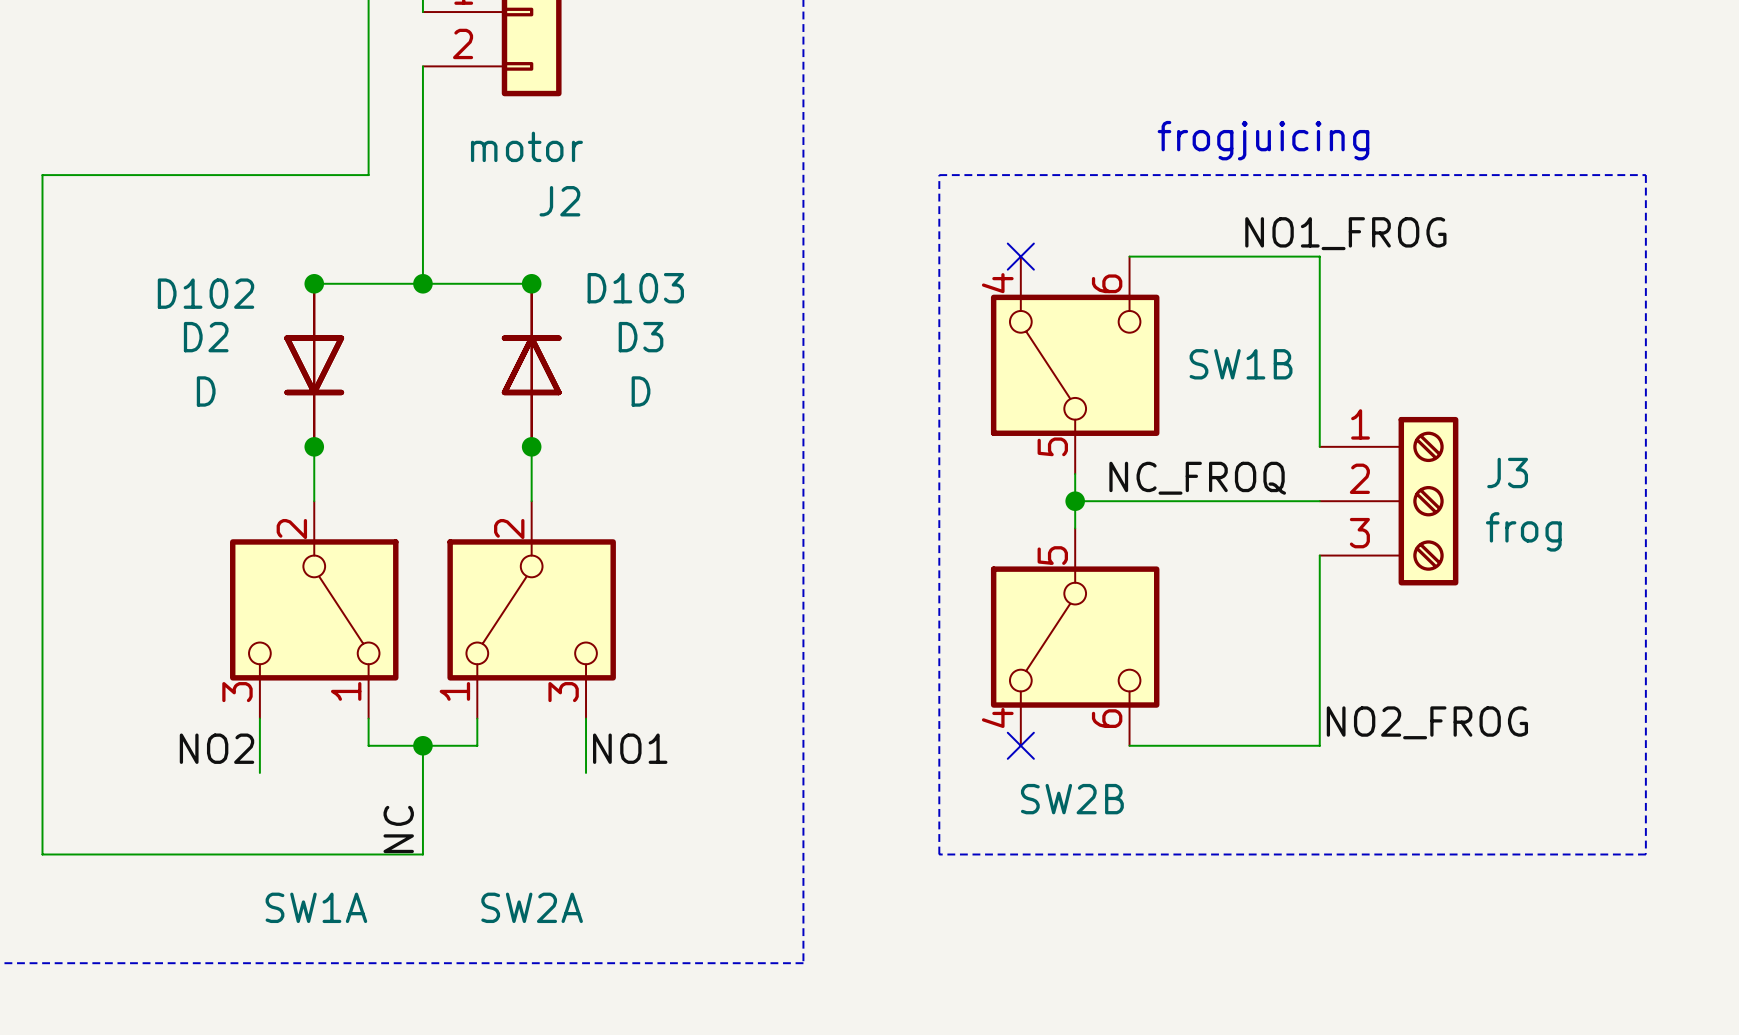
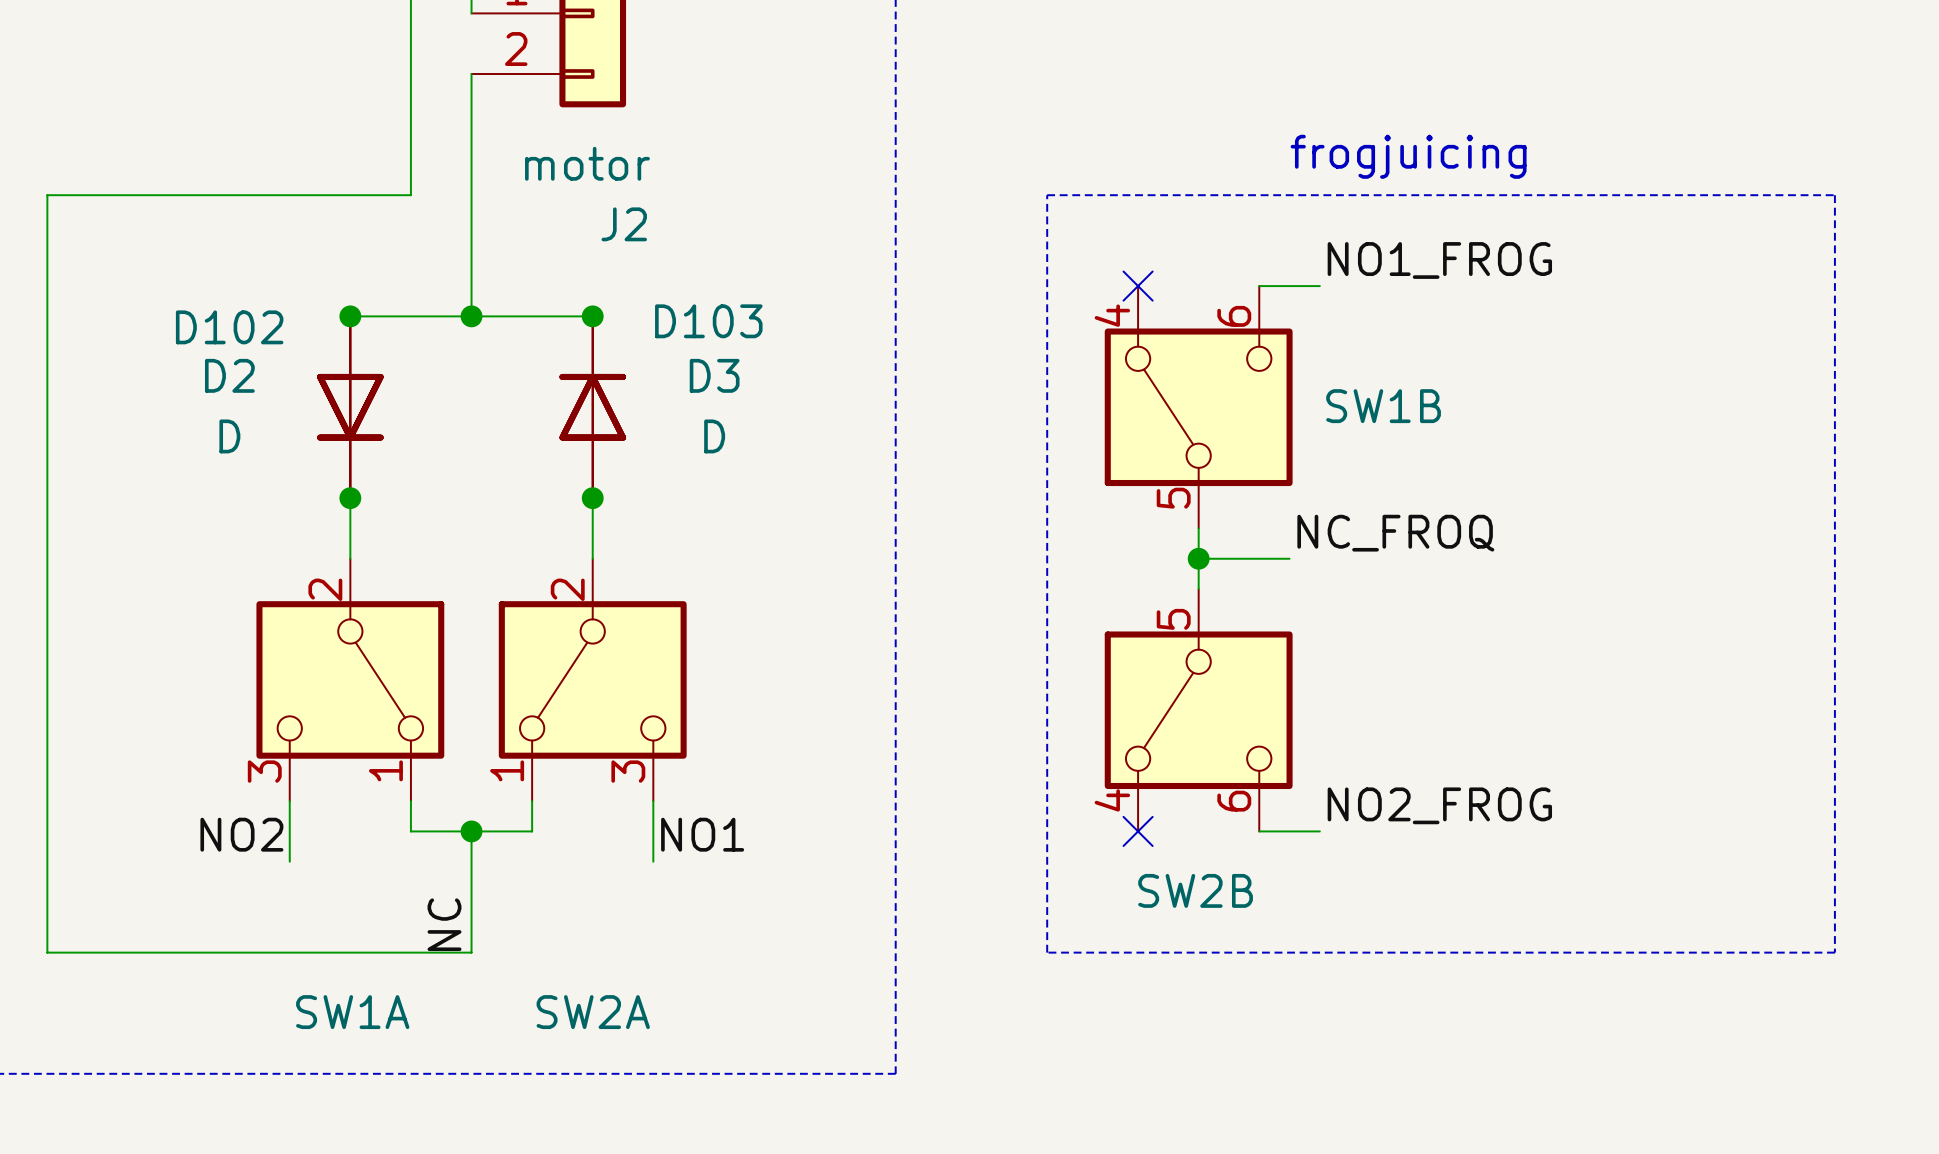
label position: NO1_FROG (1345, 233) -> NO1_FROG (1439, 260)
wire: (1183, 256) (1319, 256) (1319, 446) -> none
label position: NC_FROQ (1197, 478) -> NC_FROQ (1395, 533)
wire: (1156, 501) (1319, 501) -> none
J3: frog (1389, 501) -> none
wire: (1319, 555) (1319, 745) (1183, 745) -> none
label position: NO2_FROG (1427, 722) -> NO2_FROG (1439, 805)

